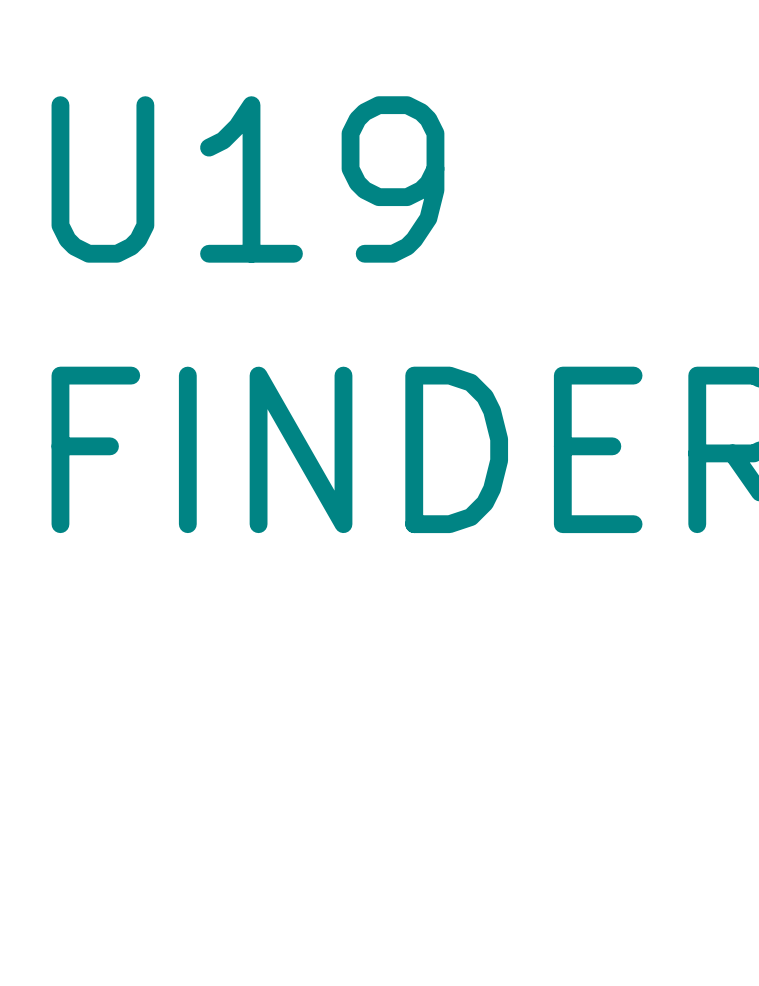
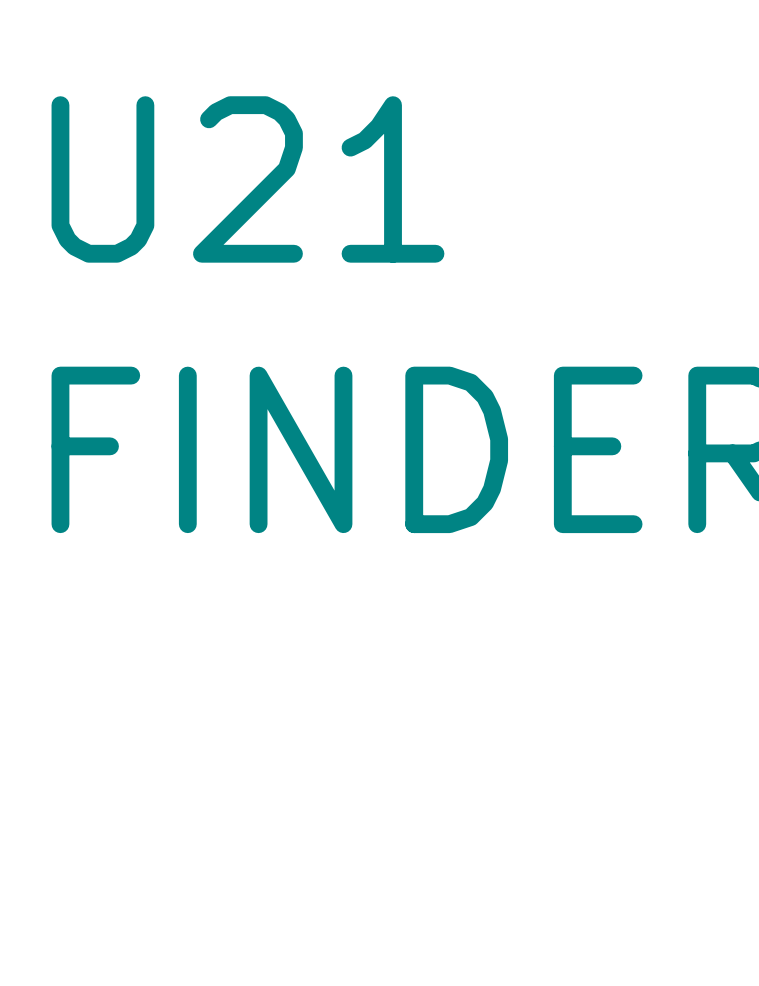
U19 name: U19 (247, 179) -> U21 (247, 179)

